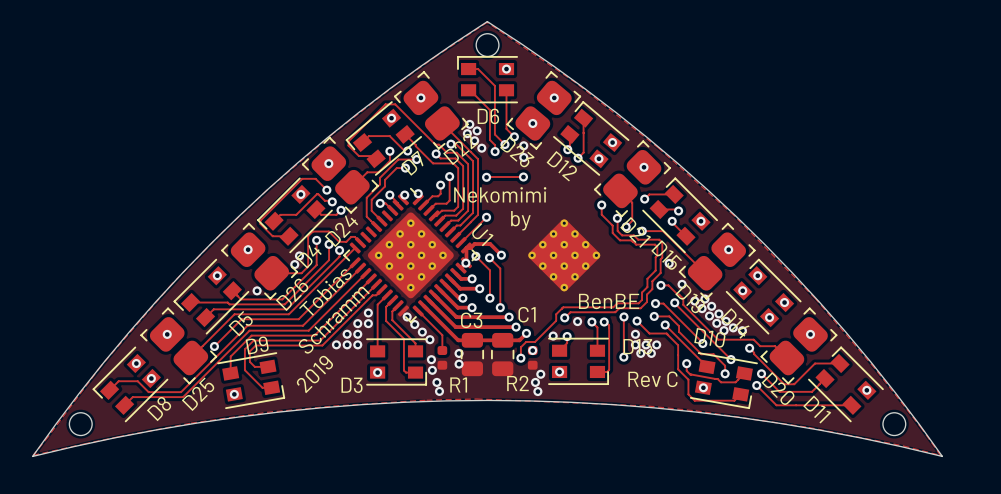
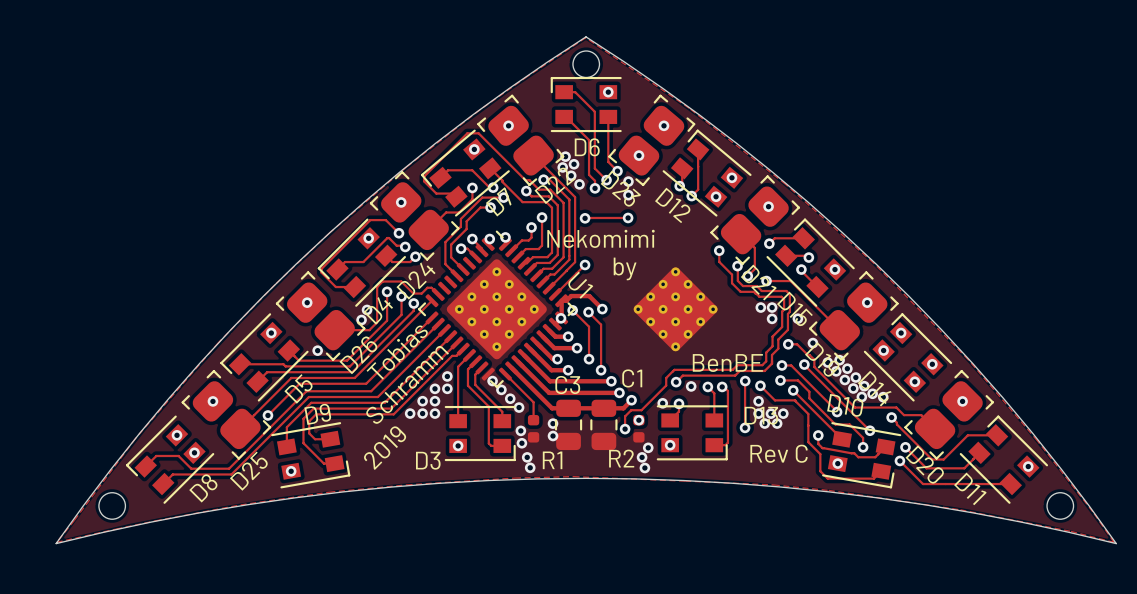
via: none -> (760, 307)
via: none -> (772, 307)
via: none -> (772, 318)

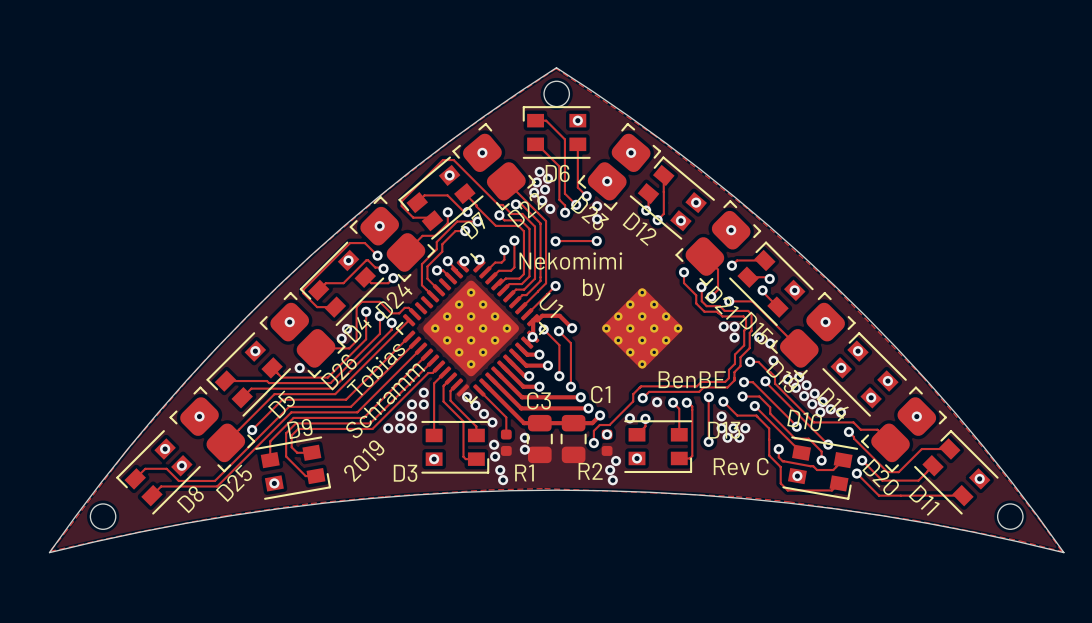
via: none -> (539, 171)
via: none -> (547, 178)
via: none -> (770, 343)

